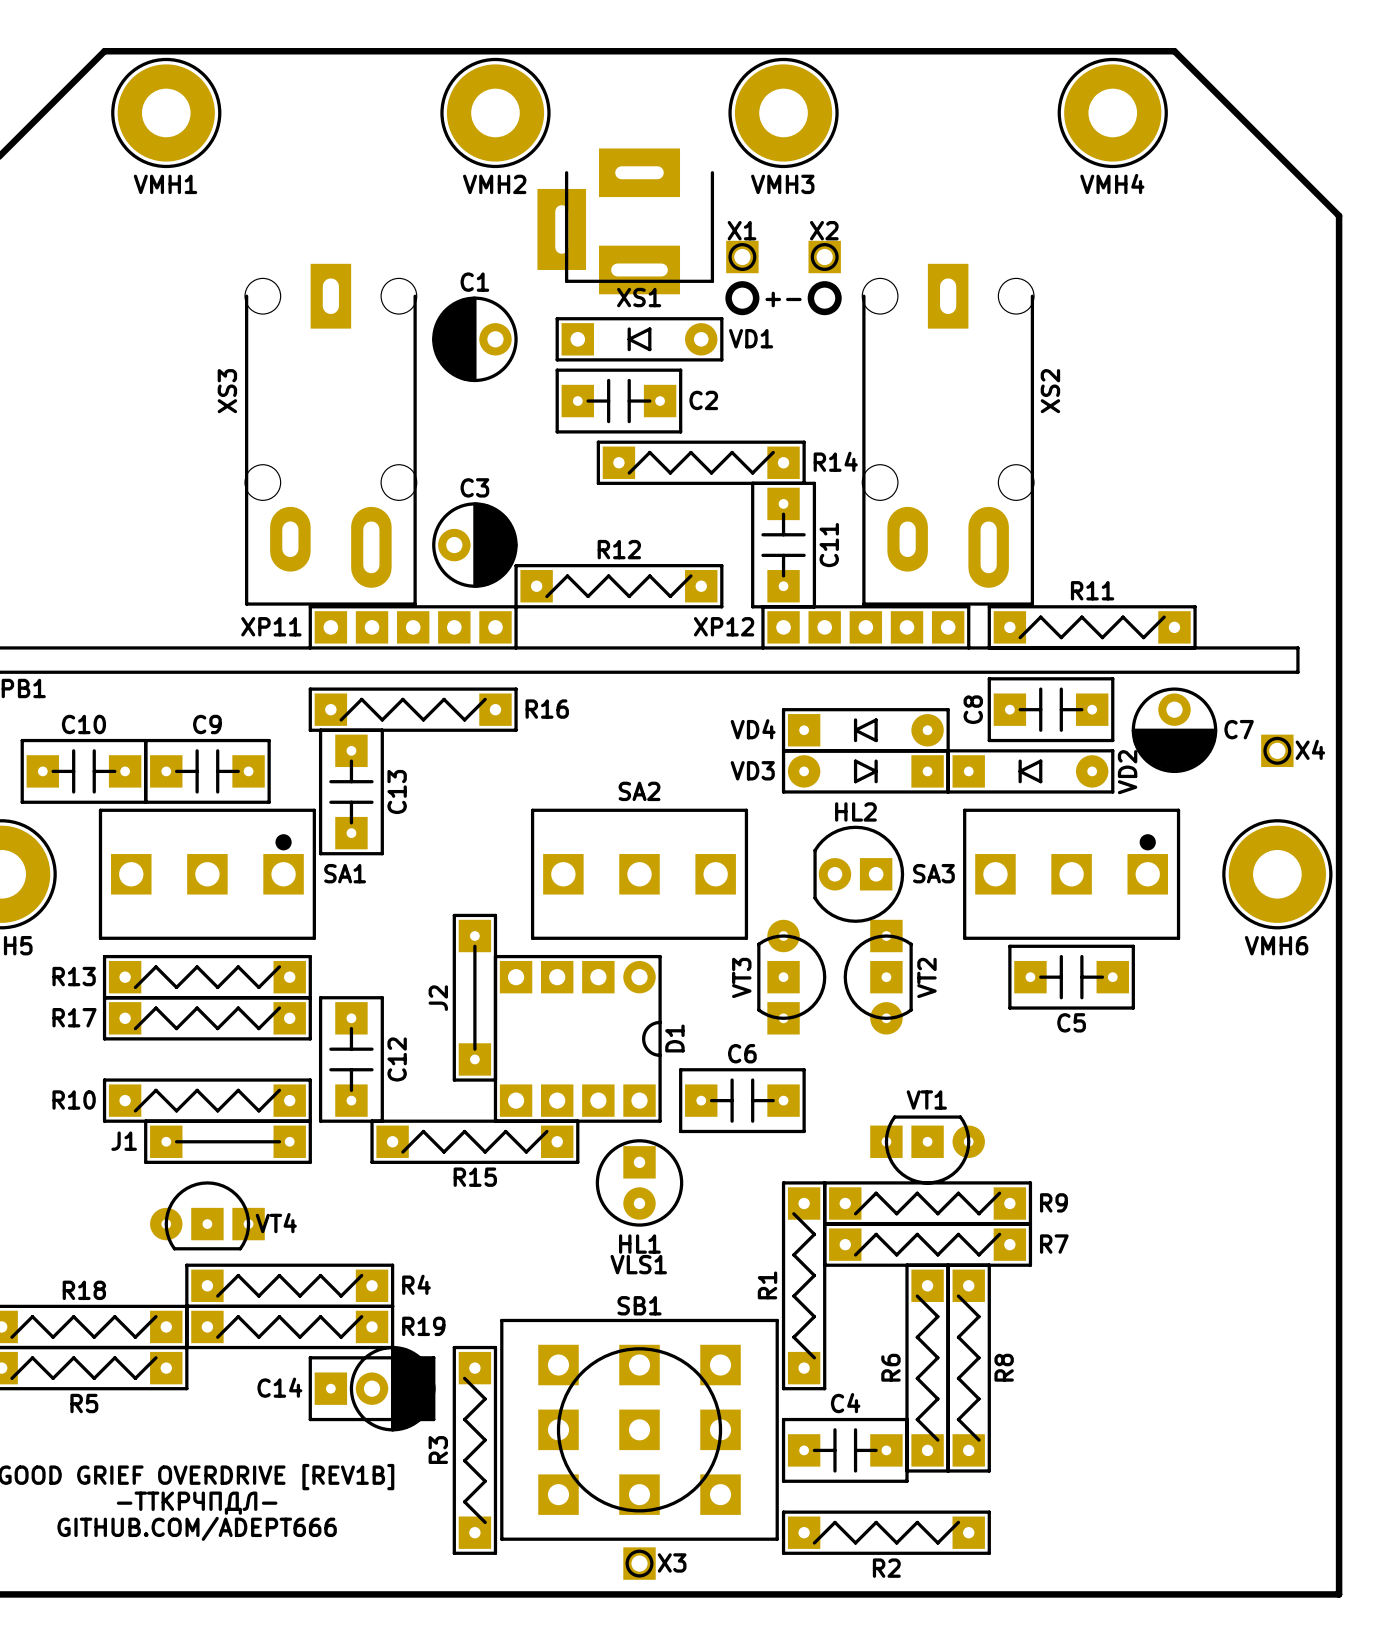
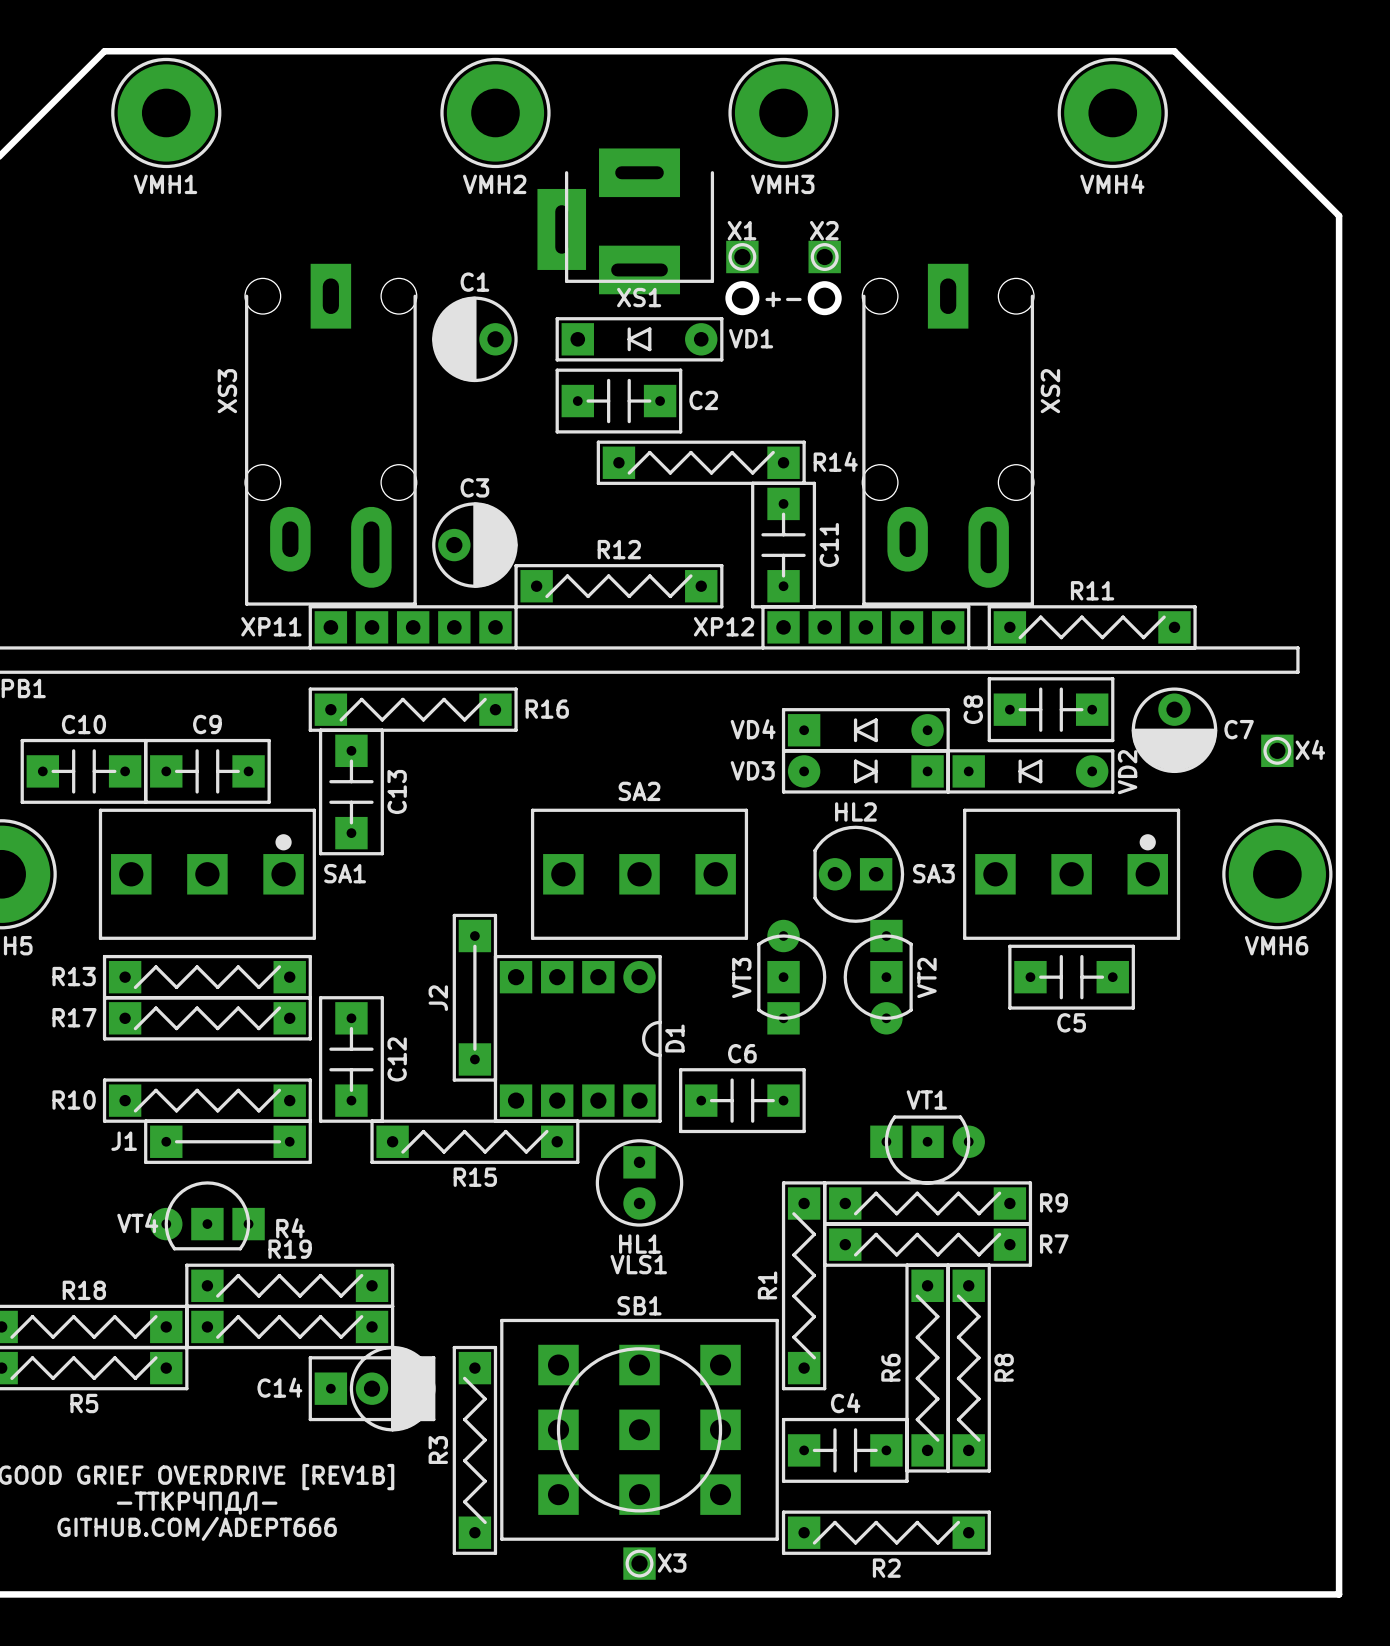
VT4 name position: VT4 (276, 1223) -> VT4 (137, 1223)
R4 name position: R4 (416, 1284) -> R4 (290, 1228)
R19 name position: R19 (423, 1326) -> R19 (290, 1249)

